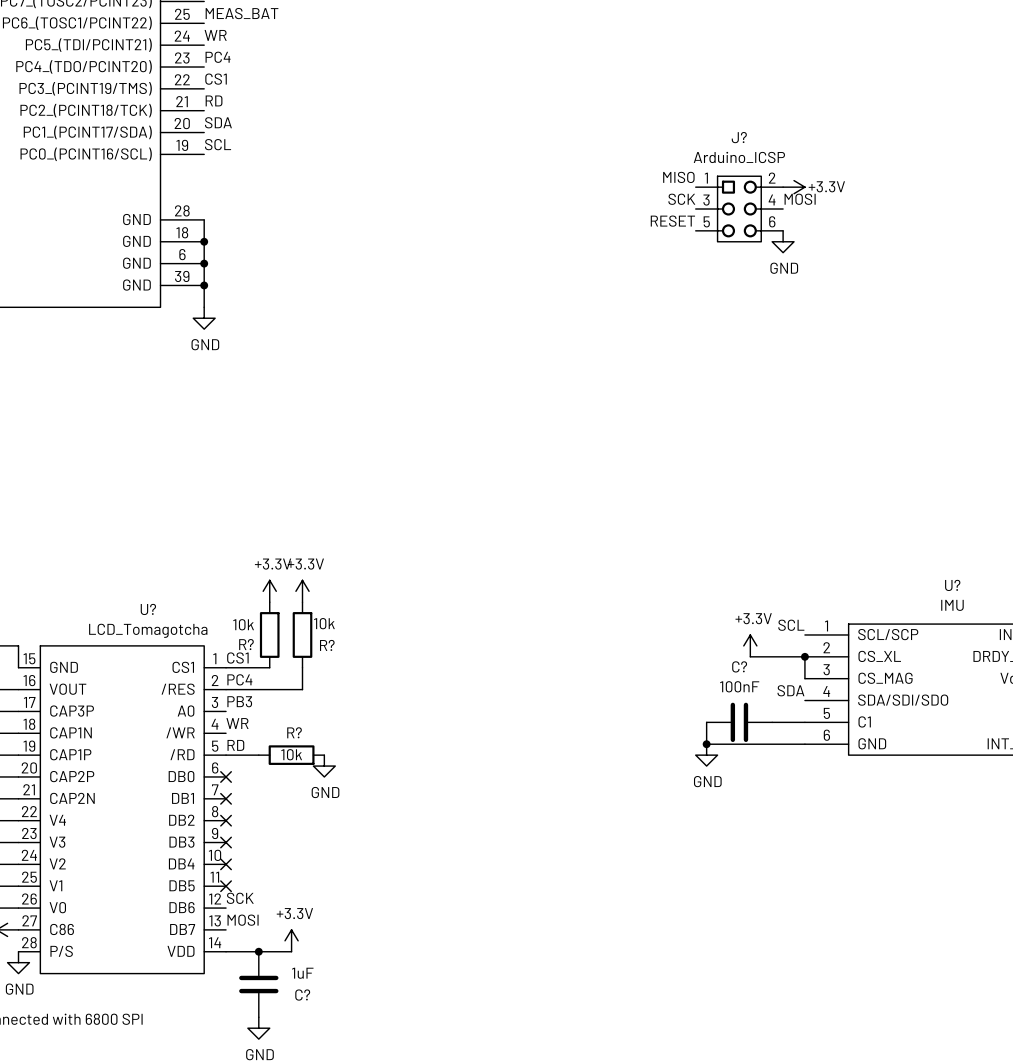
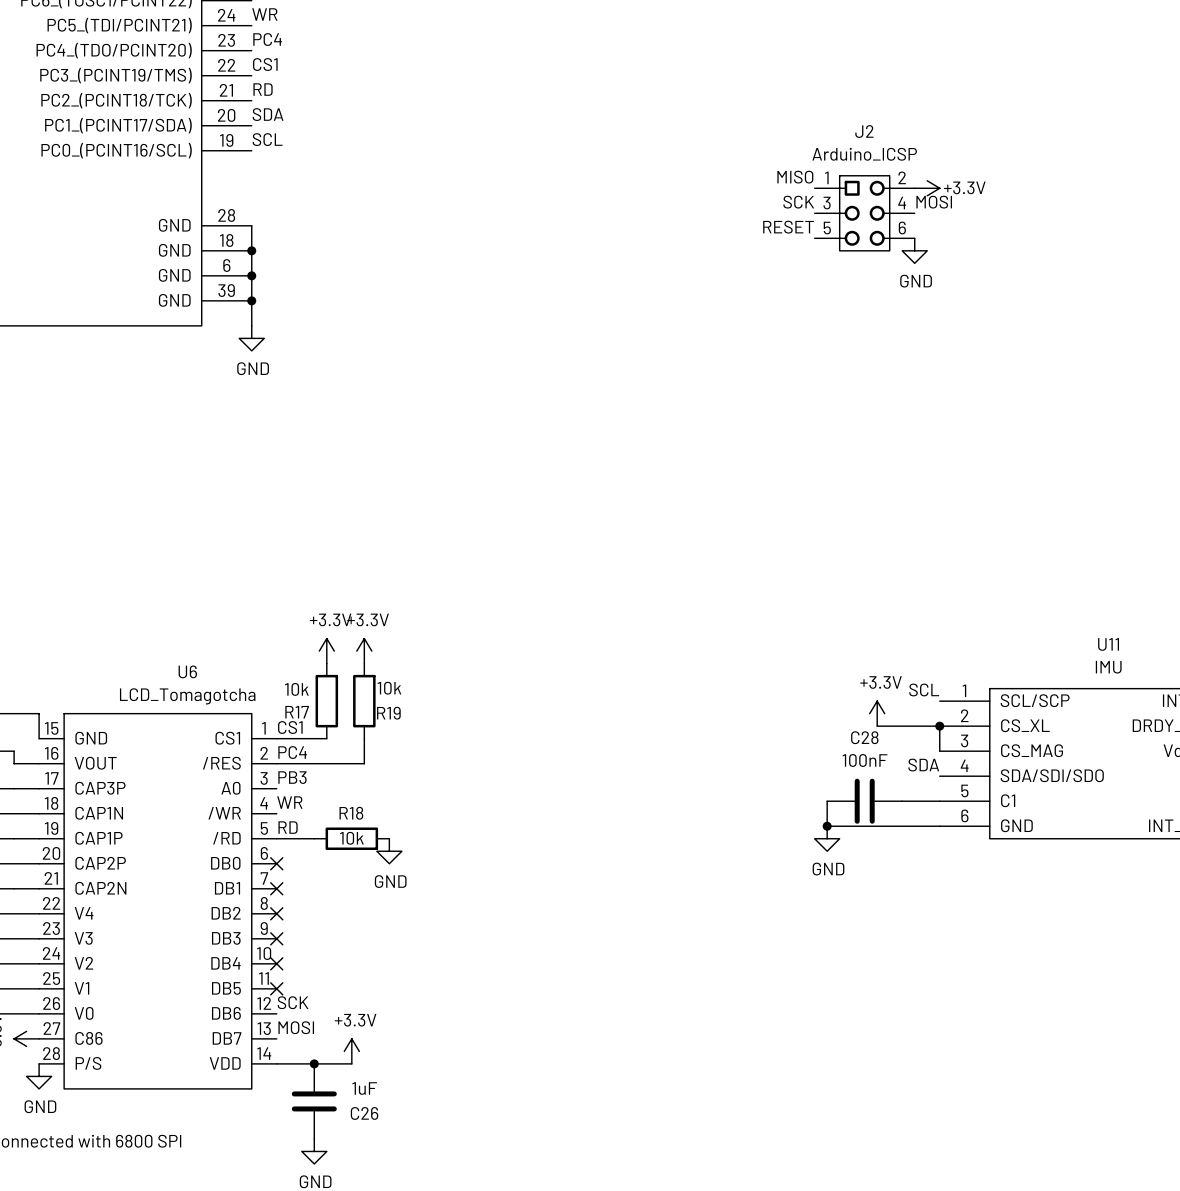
J? name: J? (739, 137) -> J2 (864, 131)
U? name: U? (952, 585) -> U11 (1108, 644)
U? name: U? (148, 609) -> U6 (187, 671)
R? name: R? (246, 644) -> R17 (297, 712)
R? name: R? (327, 645) -> R19 (388, 713)
C? name: C? (739, 666) -> C28 (864, 737)
R? name: R? (294, 732) -> R18 (351, 813)
C? name: C? (302, 995) -> C26 (364, 1113)

